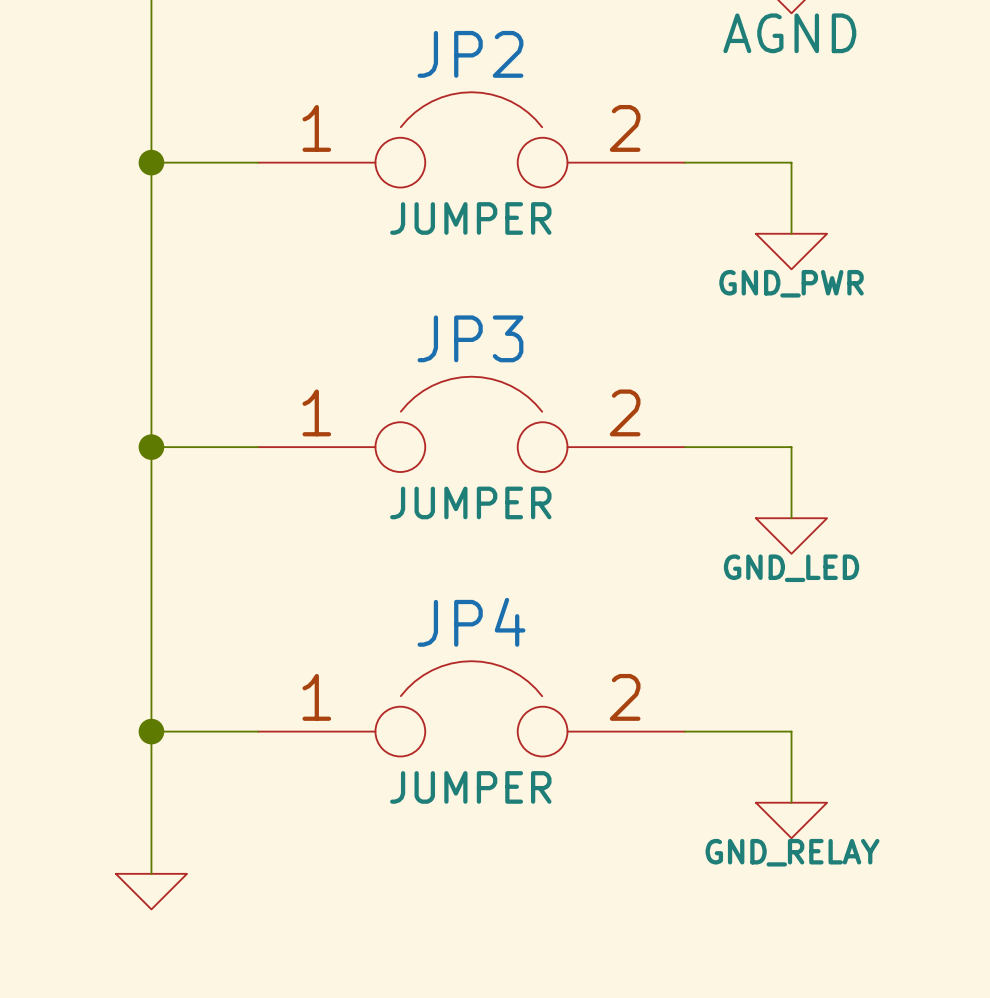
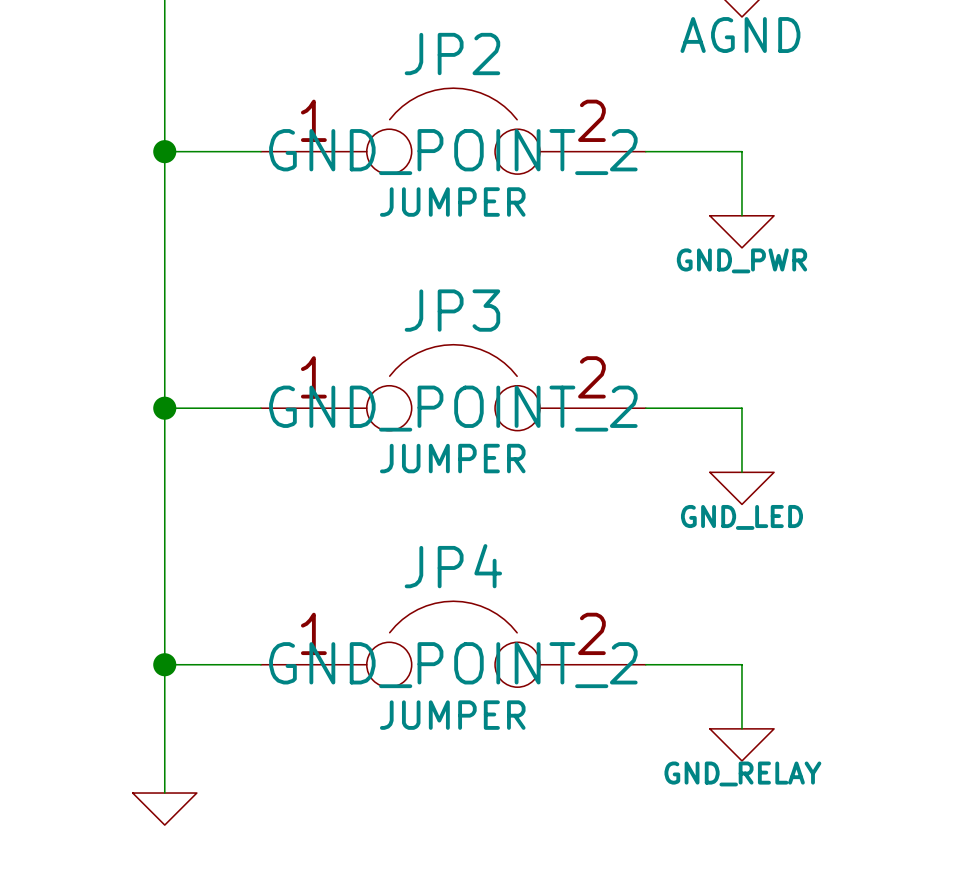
JP2 text: none -> GND_POINT_2 (453, 152)
JP3 text: none -> GND_POINT_2 (453, 408)
JP4 text: none -> GND_POINT_2 (453, 665)

